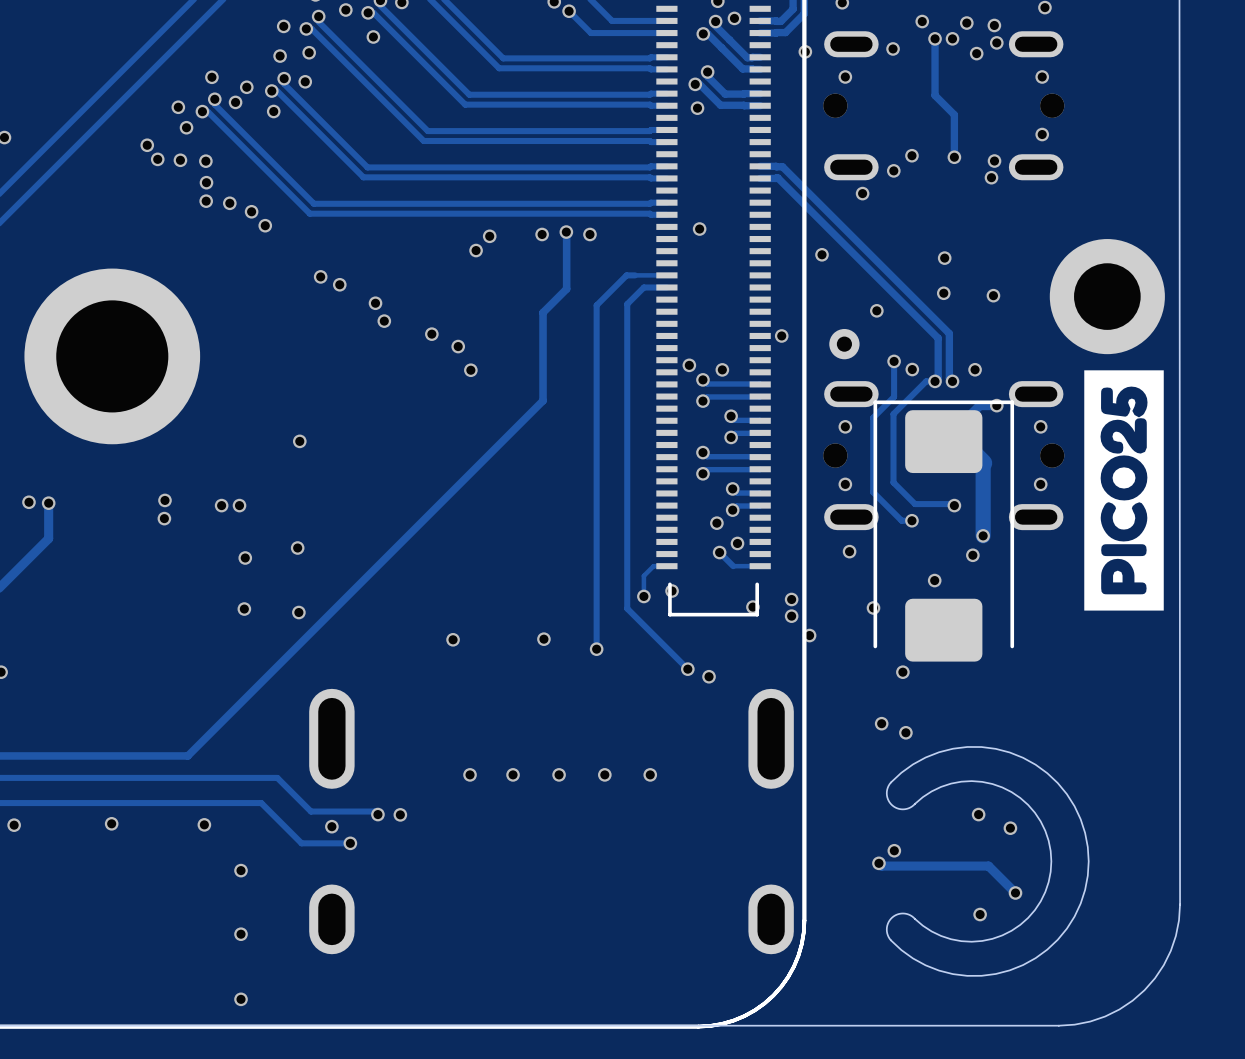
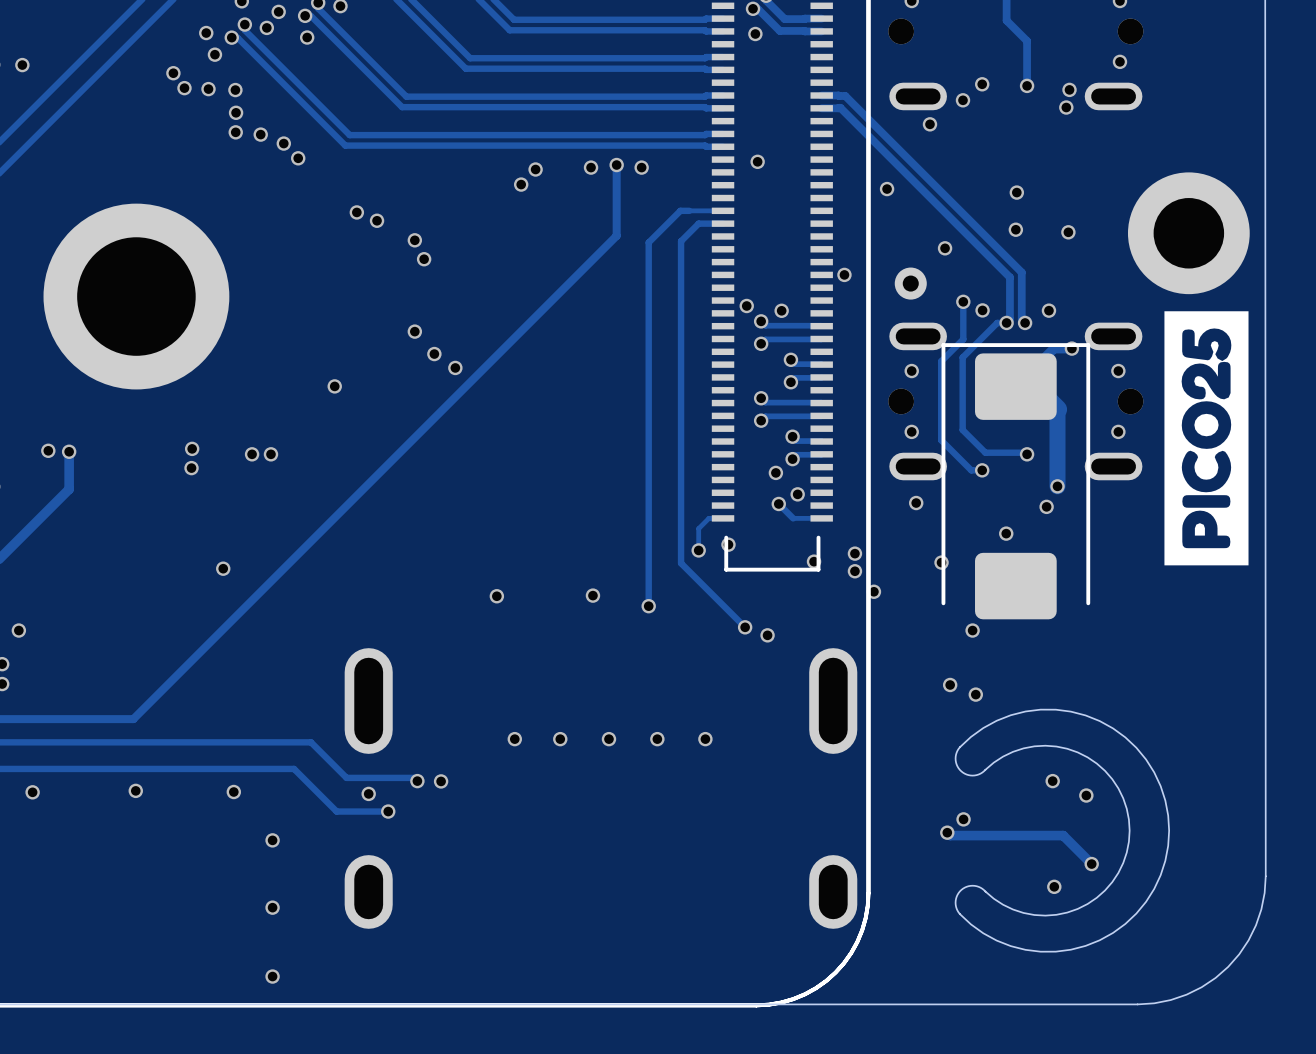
track: (566, 232) (566, 289) (543, 312) (543, 400) (187, 755) (109, 755) -> (616, 165) (616, 235) (133, 719)
via: (431, 334) -> none
via: (458, 346) -> none
via: (470, 370) -> none
via: none -> (414, 331)
via: none -> (434, 354)
via: none -> (455, 367)
via: (297, 548) -> none
via: (245, 557) -> none
via: (244, 609) -> none
via: (298, 612) -> none
via: none -> (223, 568)

